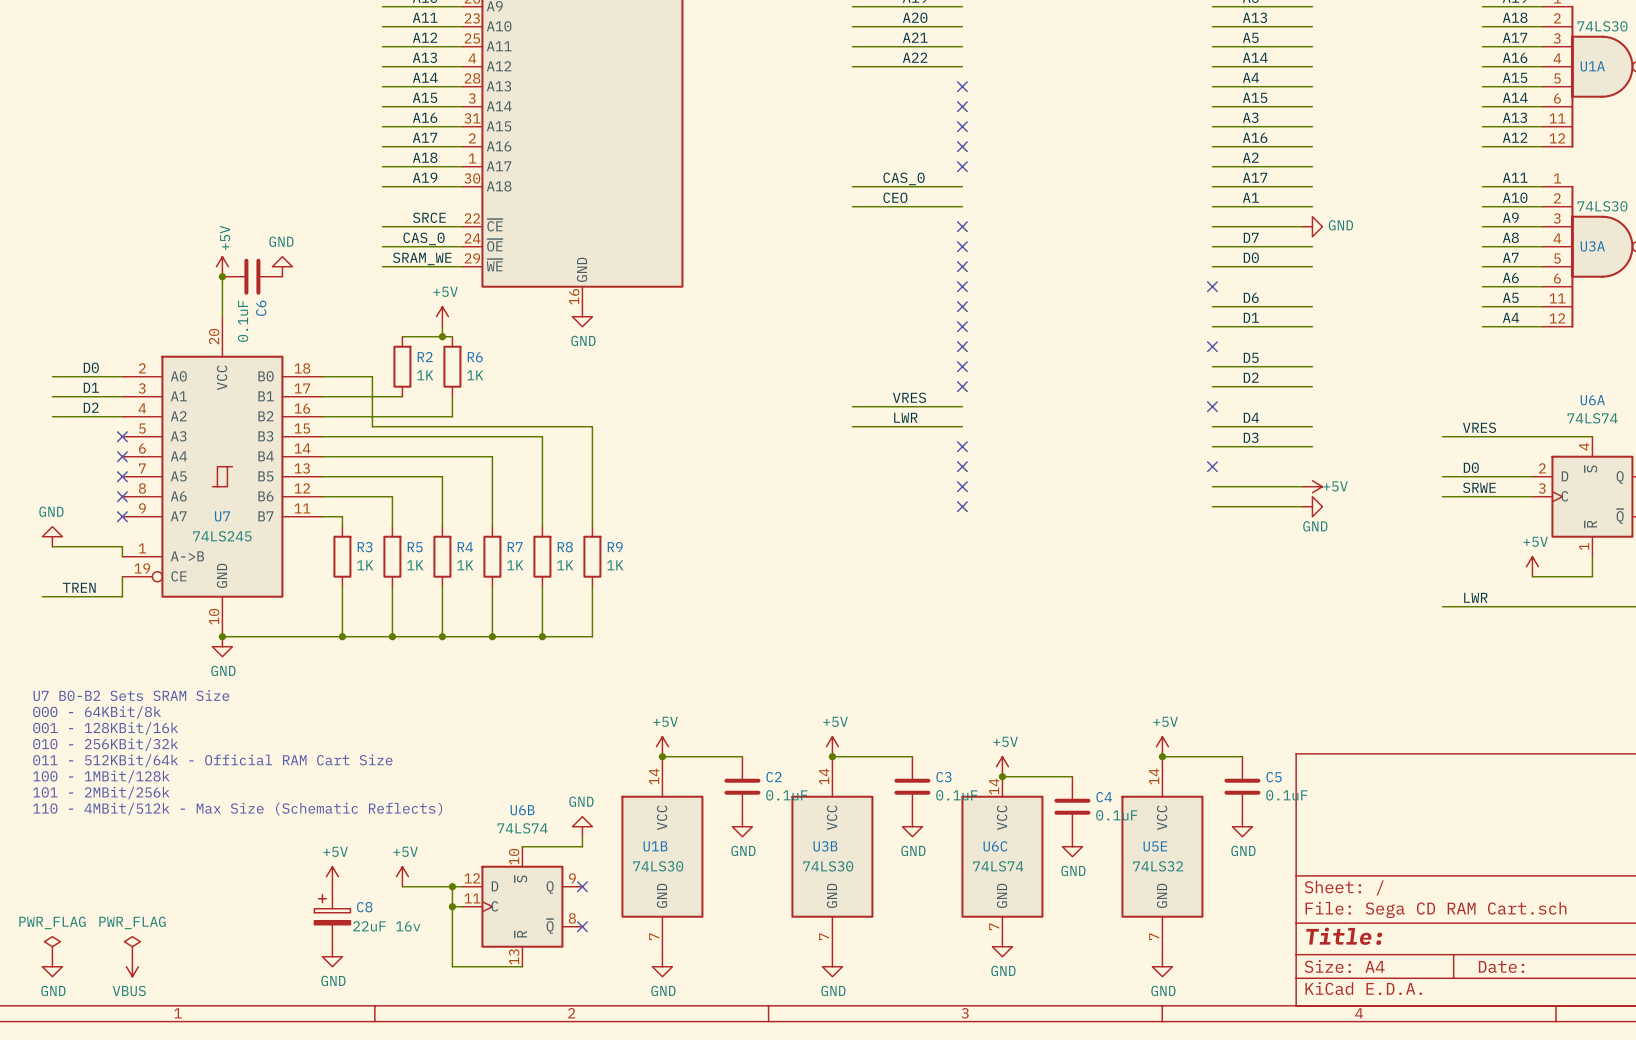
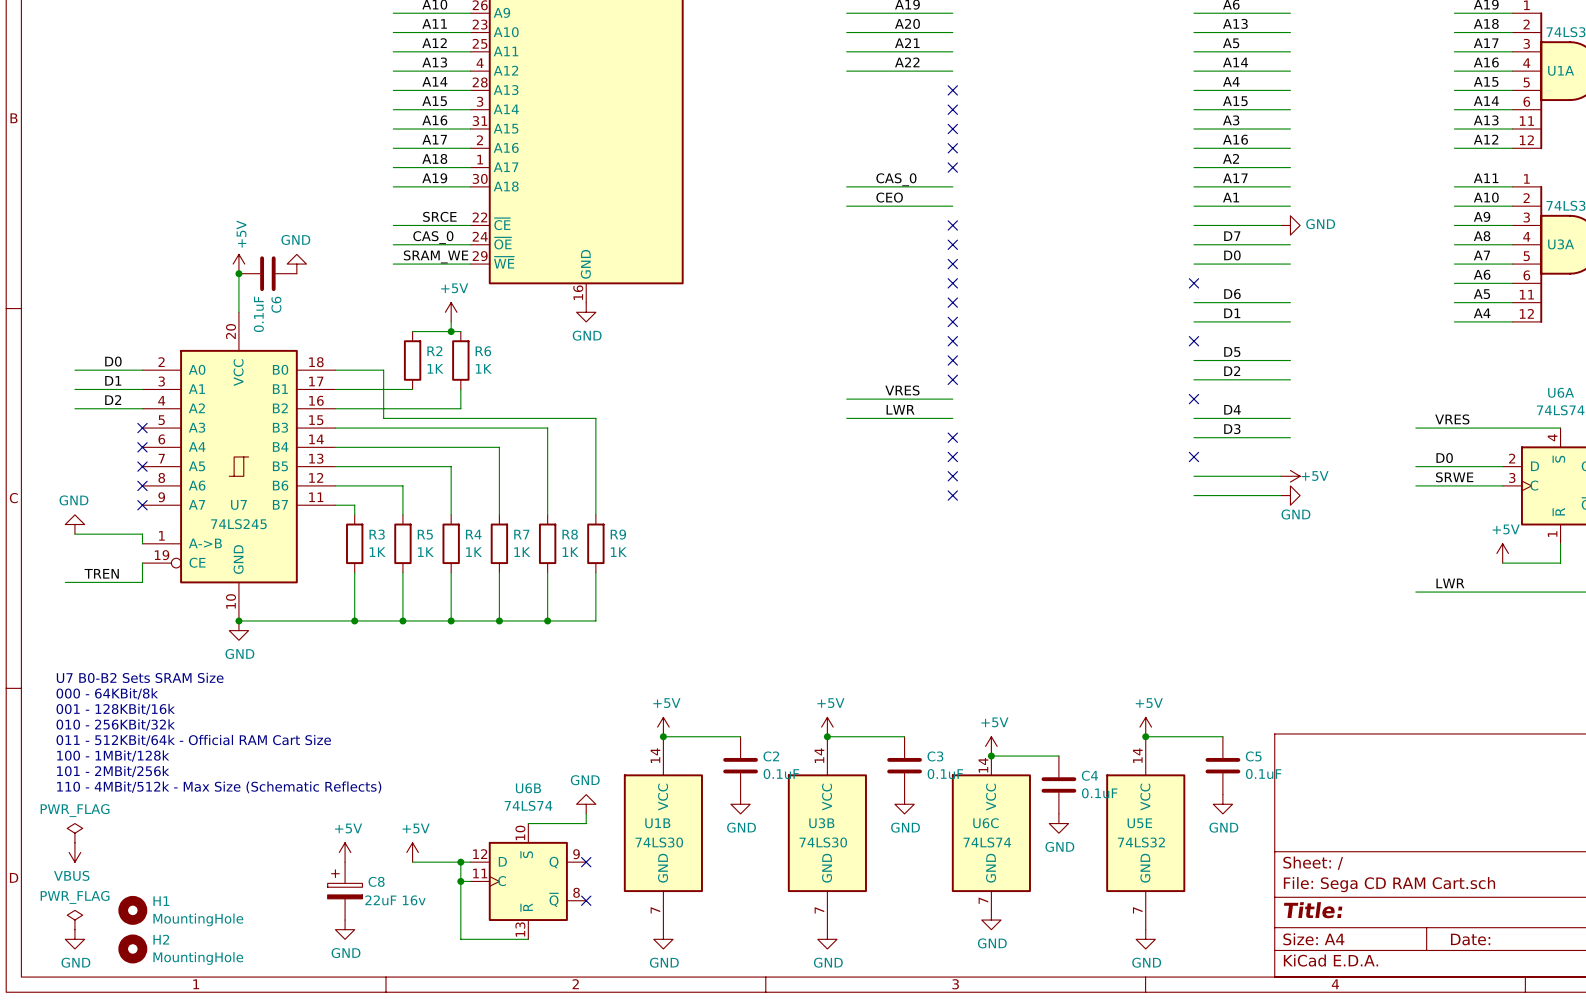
H1: none -> MountingHole (132, 910)
power symbol position: PWR_FLAG (132, 946) -> PWR_FLAG (74, 833)
power symbol position: VBUS (132, 966) -> VBUS (74, 852)
H2: none -> MountingHole (132, 948)

